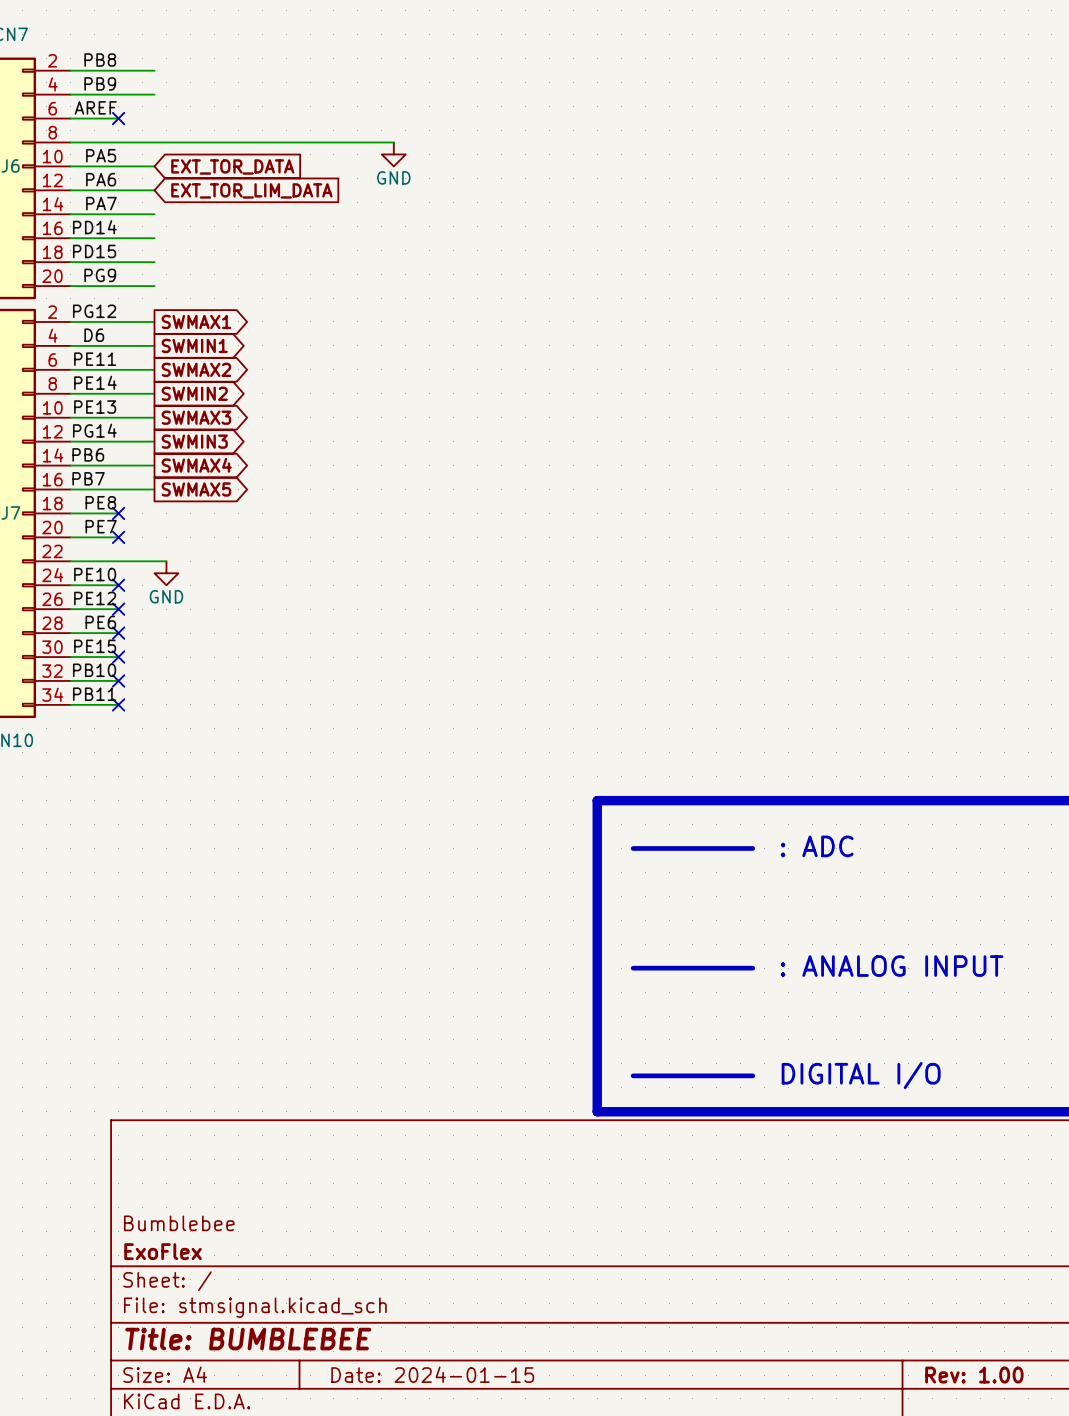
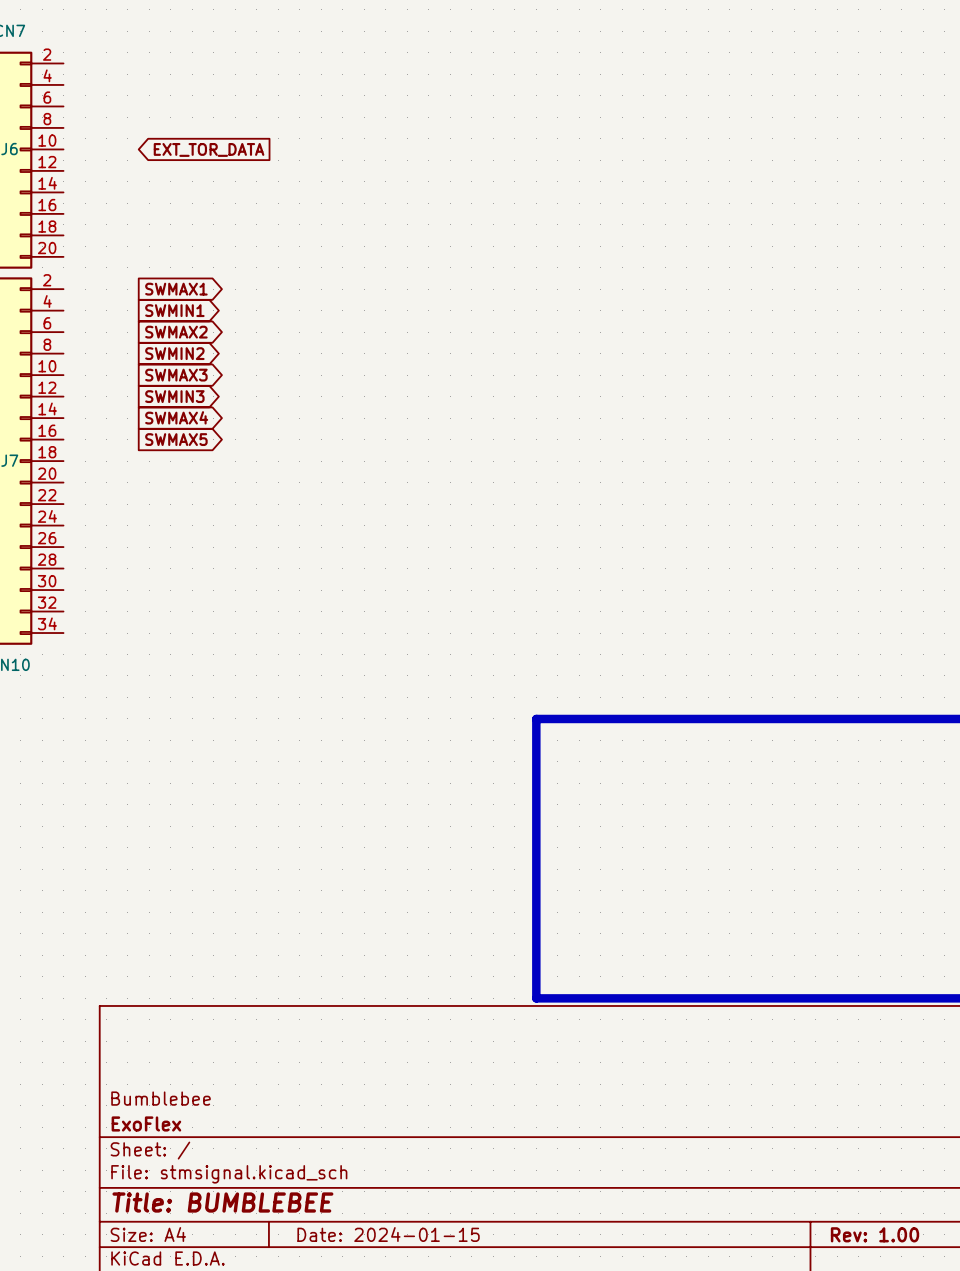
label: PB8 (100, 60) -> none
wire: (70, 70) (154, 70) -> none
label: PB9 (100, 83) -> none
wire: (70, 94) (154, 94) -> none
label: AREF (95, 107) -> none
wire: (70, 118) (118, 118) -> none
no-connect mark: (118, 118) -> none
wire: (70, 142) (393, 142) -> none
power symbol: GND (393, 154) -> none
label: PA5 (101, 155) -> none
wire: (70, 166) (154, 166) -> none
label: PA6 (101, 179) -> none
wire: (70, 190) (154, 190) -> none
global label: EXT_TOR_LIM_DATA (251, 190) -> none
label: PA7 (101, 203) -> none
wire: (70, 214) (154, 214) -> none
label: PD14 (94, 227) -> none
wire: (70, 238) (154, 238) -> none
label: PD15 (94, 251) -> none
wire: (70, 262) (154, 262) -> none
label: PG9 (100, 275) -> none
wire: (70, 286) (154, 286) -> none
label: PG12 (94, 311) -> none
wire: (70, 321) (154, 321) -> none
label: D6 (94, 335) -> none
wire: (70, 345) (154, 345) -> none
label: PE11 (95, 359) -> none
wire: (70, 369) (154, 369) -> none
label: PE14 (95, 382) -> none
wire: (70, 393) (154, 393) -> none
label: PE13 (95, 407) -> none
wire: (70, 417) (154, 417) -> none
label: PG14 (94, 430) -> none
wire: (70, 441) (154, 441) -> none
label: PB6 (88, 454) -> none
wire: (70, 465) (154, 465) -> none
label: PB7 (88, 478) -> none
wire: (70, 489) (154, 489) -> none
label: PE8 (100, 502) -> none
wire: (70, 513) (118, 513) -> none
no-connect mark: (118, 513) -> none
label: PE7 (101, 526) -> none
wire: (70, 537) (118, 537) -> none
no-connect mark: (118, 537) -> none
wire: (70, 561) (166, 561) -> none
power symbol: GND (166, 573) -> none
label: PE10 (95, 574) -> none
wire: (70, 585) (118, 585) -> none
no-connect mark: (118, 585) -> none
label: PE12 (95, 598) -> none
wire: (70, 609) (118, 609) -> none
no-connect mark: (118, 609) -> none
label: PE6 (100, 622) -> none
wire: (70, 633) (118, 633) -> none
no-connect mark: (118, 633) -> none
label: PE15 (95, 646) -> none
wire: (70, 657) (118, 657) -> none
no-connect mark: (118, 657) -> none
label: PB10 (94, 670) -> none
wire: (70, 680) (118, 680) -> none
no-connect mark: (118, 680) -> none
label: PB11 (94, 694) -> none
wire: (70, 704) (118, 704) -> none
no-connect mark: (118, 704) -> none
text: : ADC (817, 846) -> none
line: (633, 848) (752, 848) -> none
text: : ANALOG INPUT (892, 966) -> none
line: (633, 968) (752, 968) -> none
line: (633, 1075) (752, 1075) -> none
text: DIGITAL I/O (861, 1075) -> none

